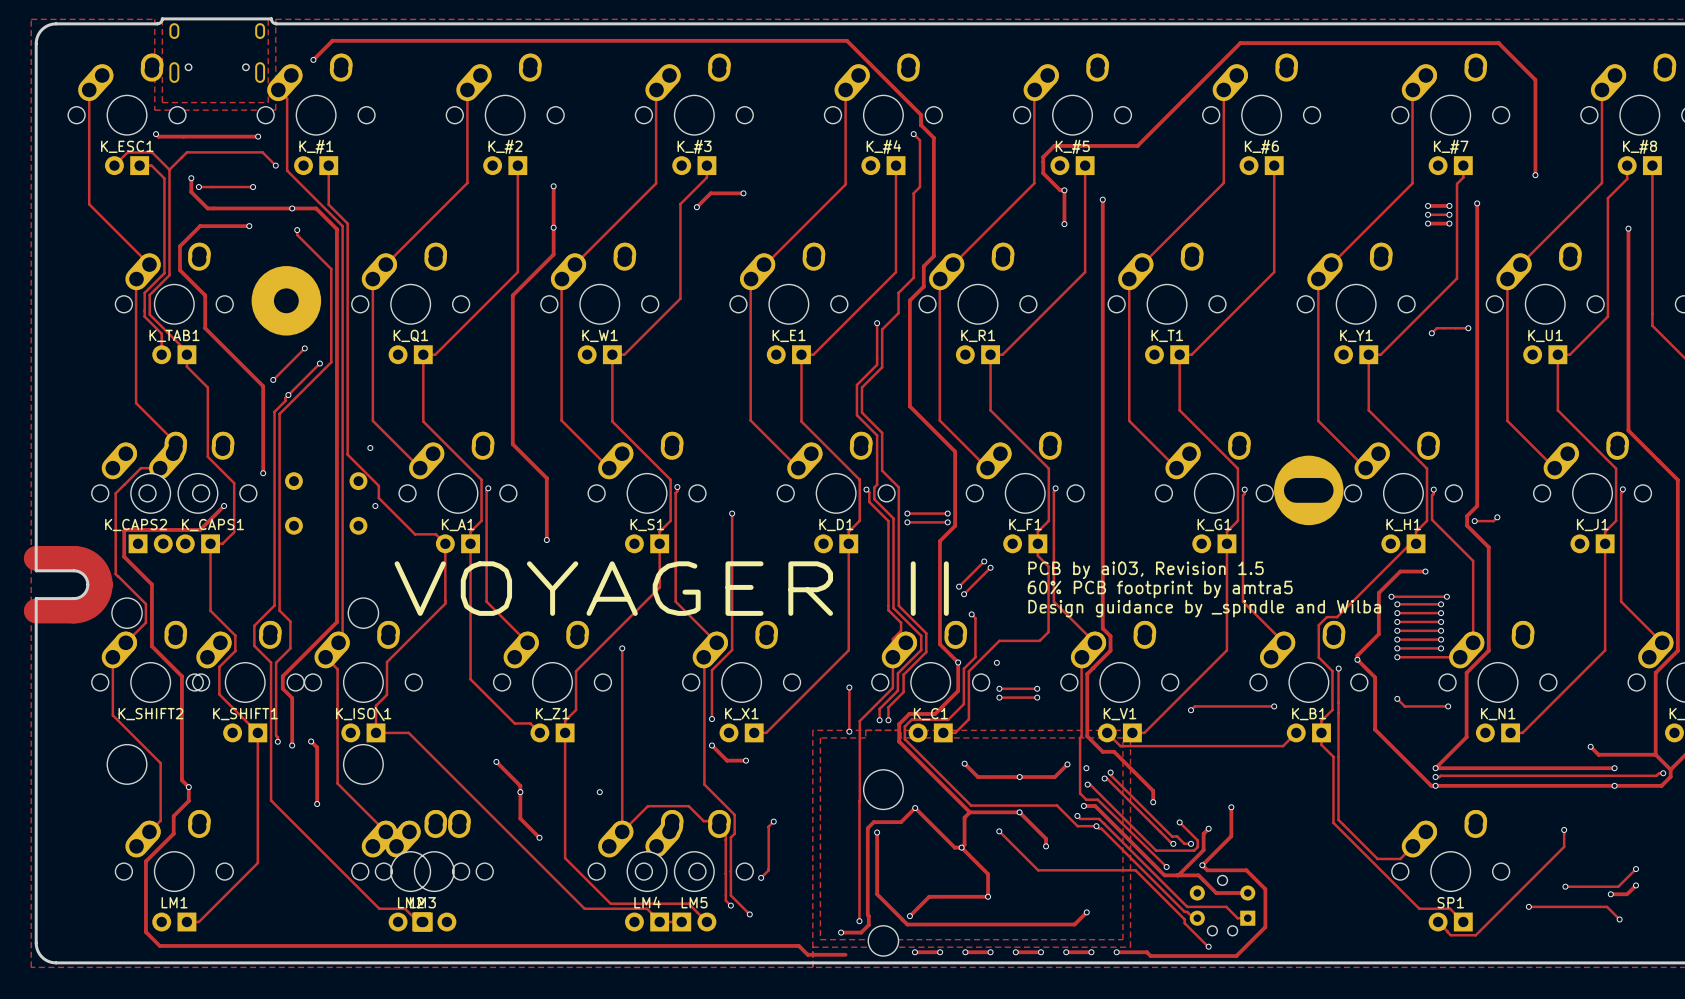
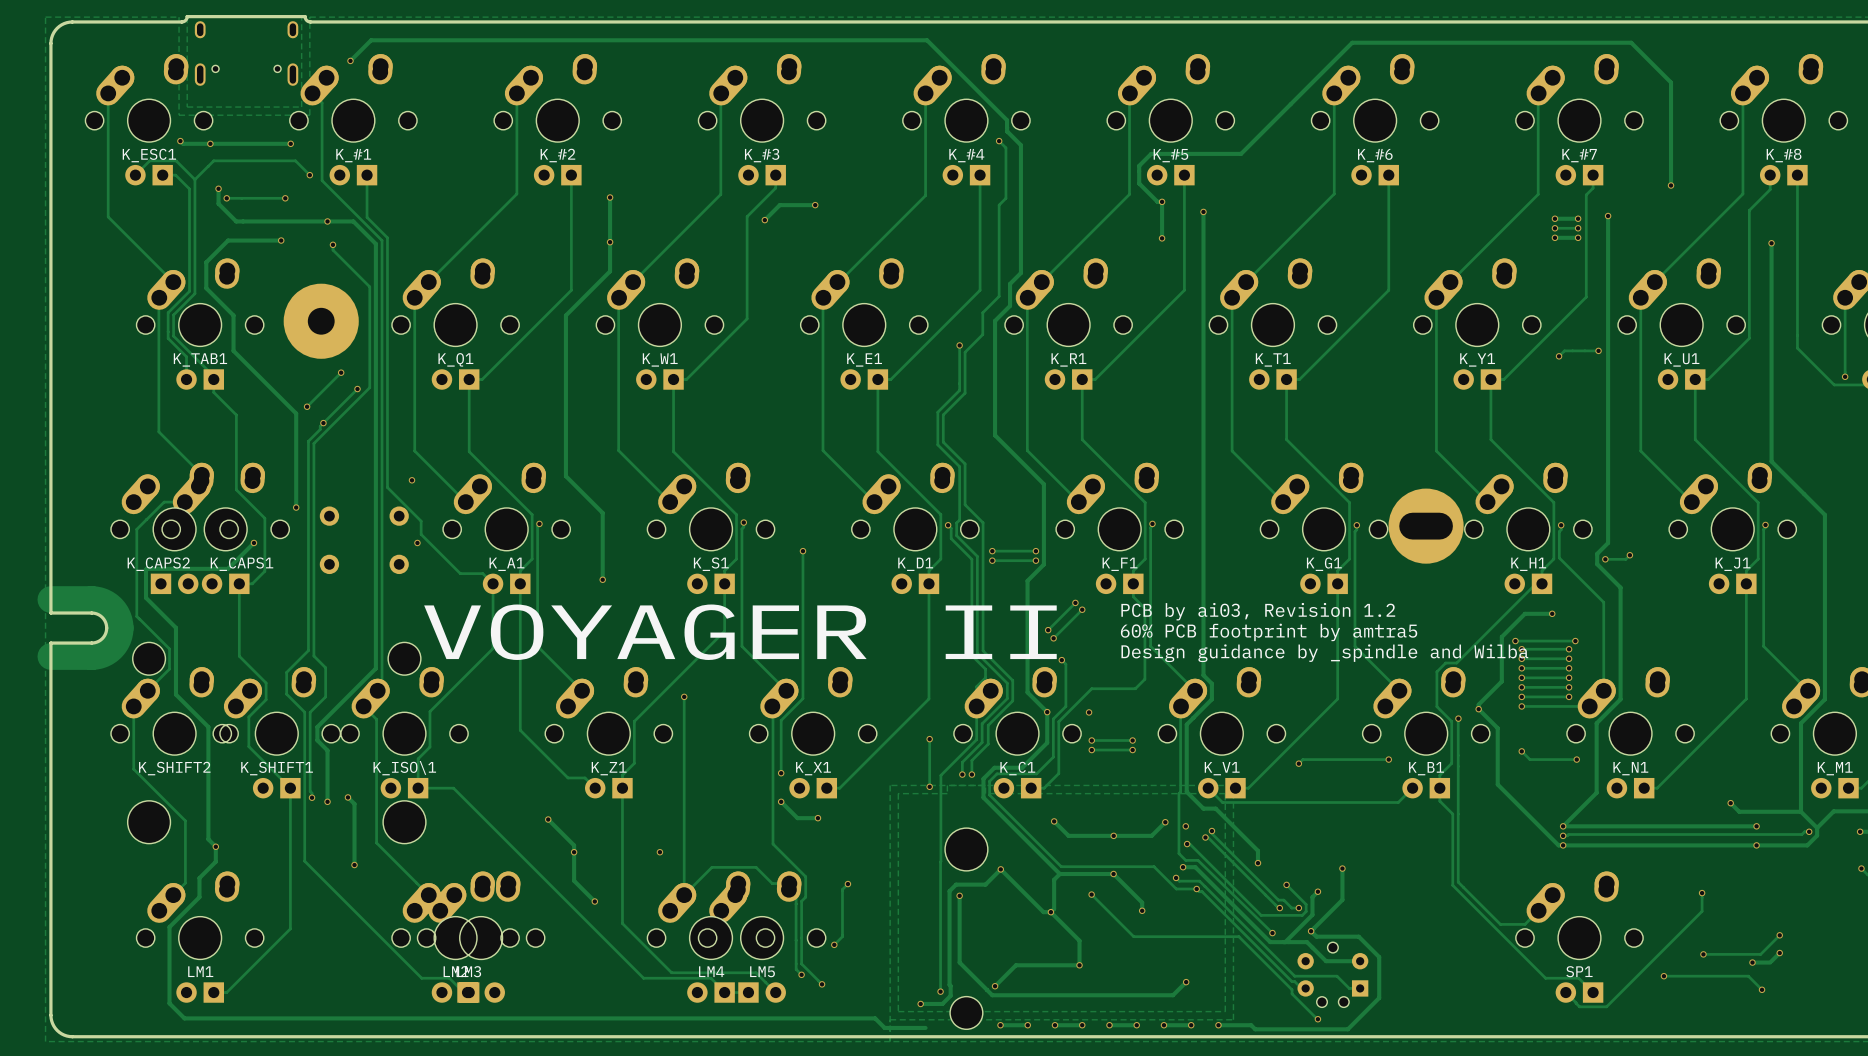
via: none -> (210, 143)
text: PCB by ai03, Revision 1.5 (1146, 570) -> PCB by ai03, Revision 1.2 (1258, 611)

